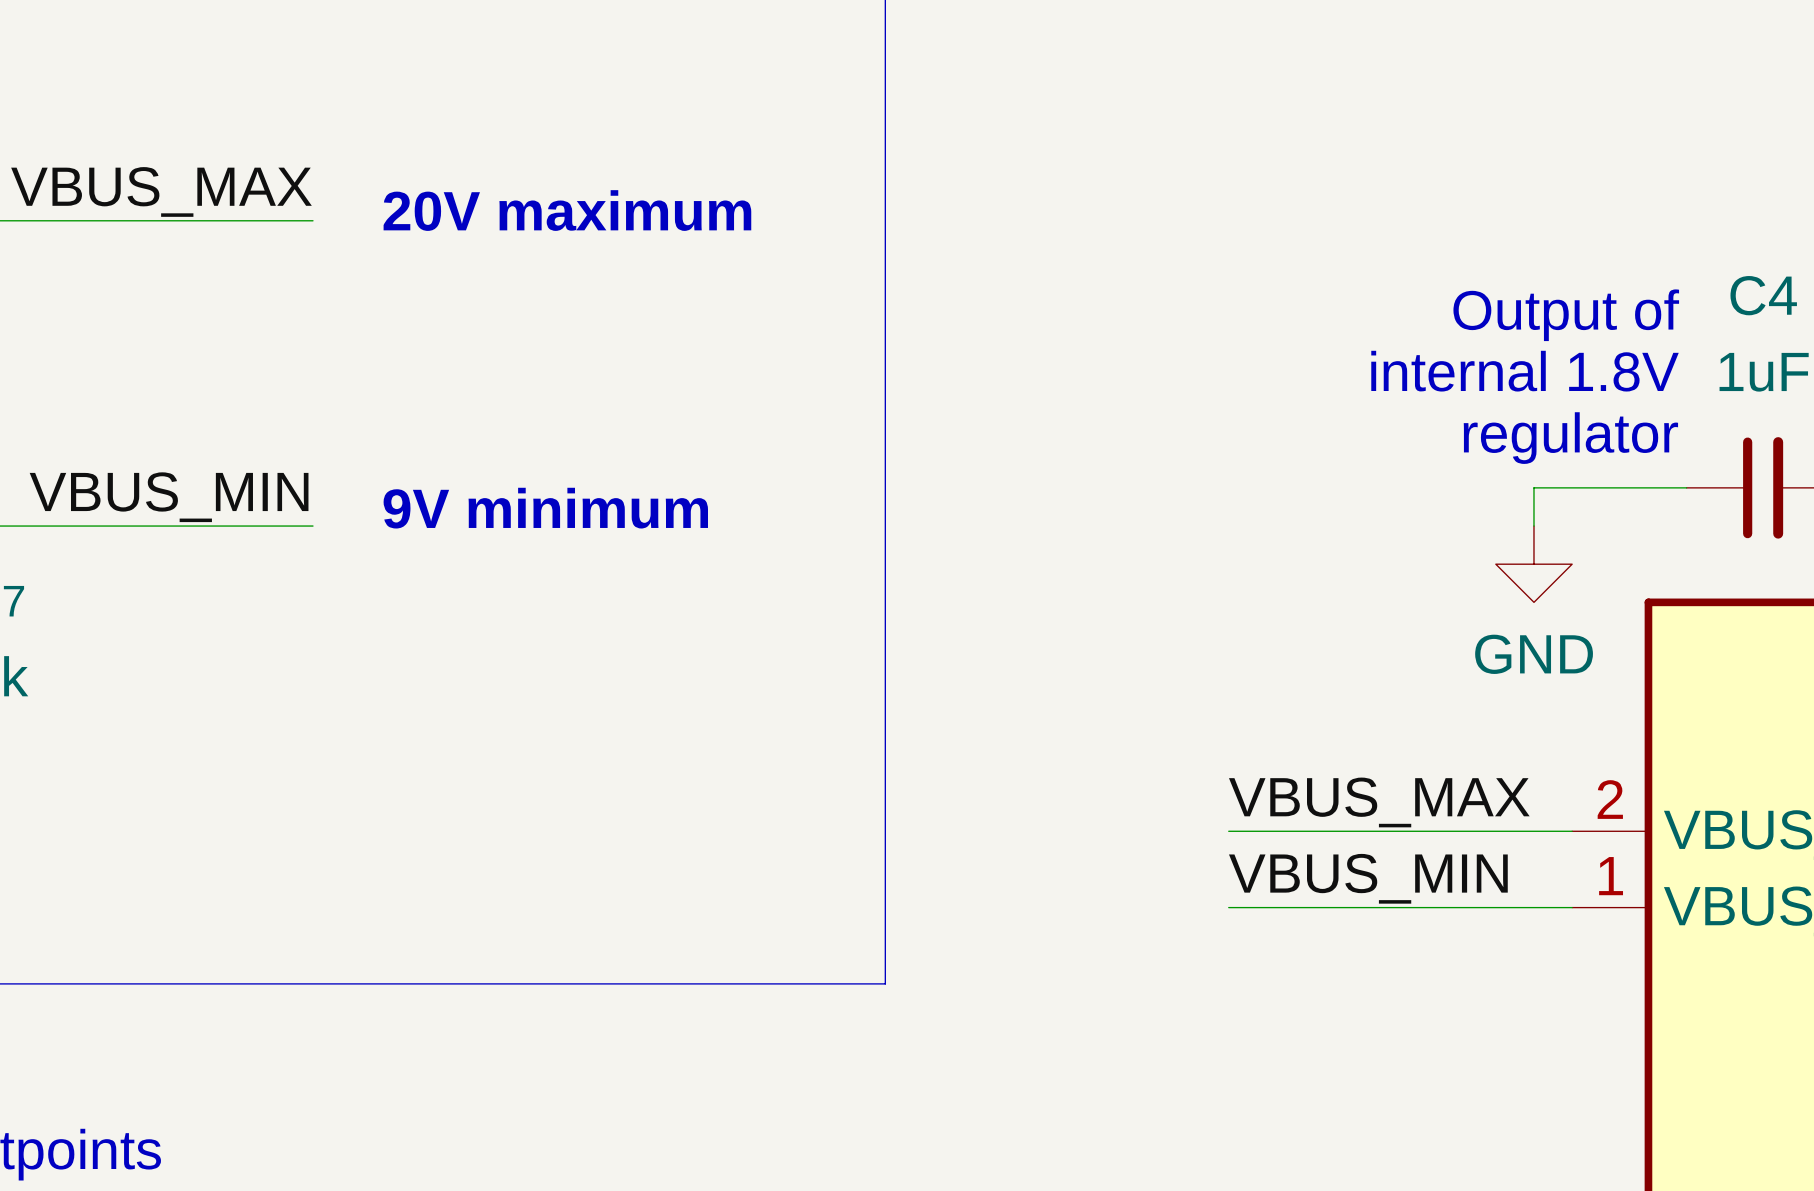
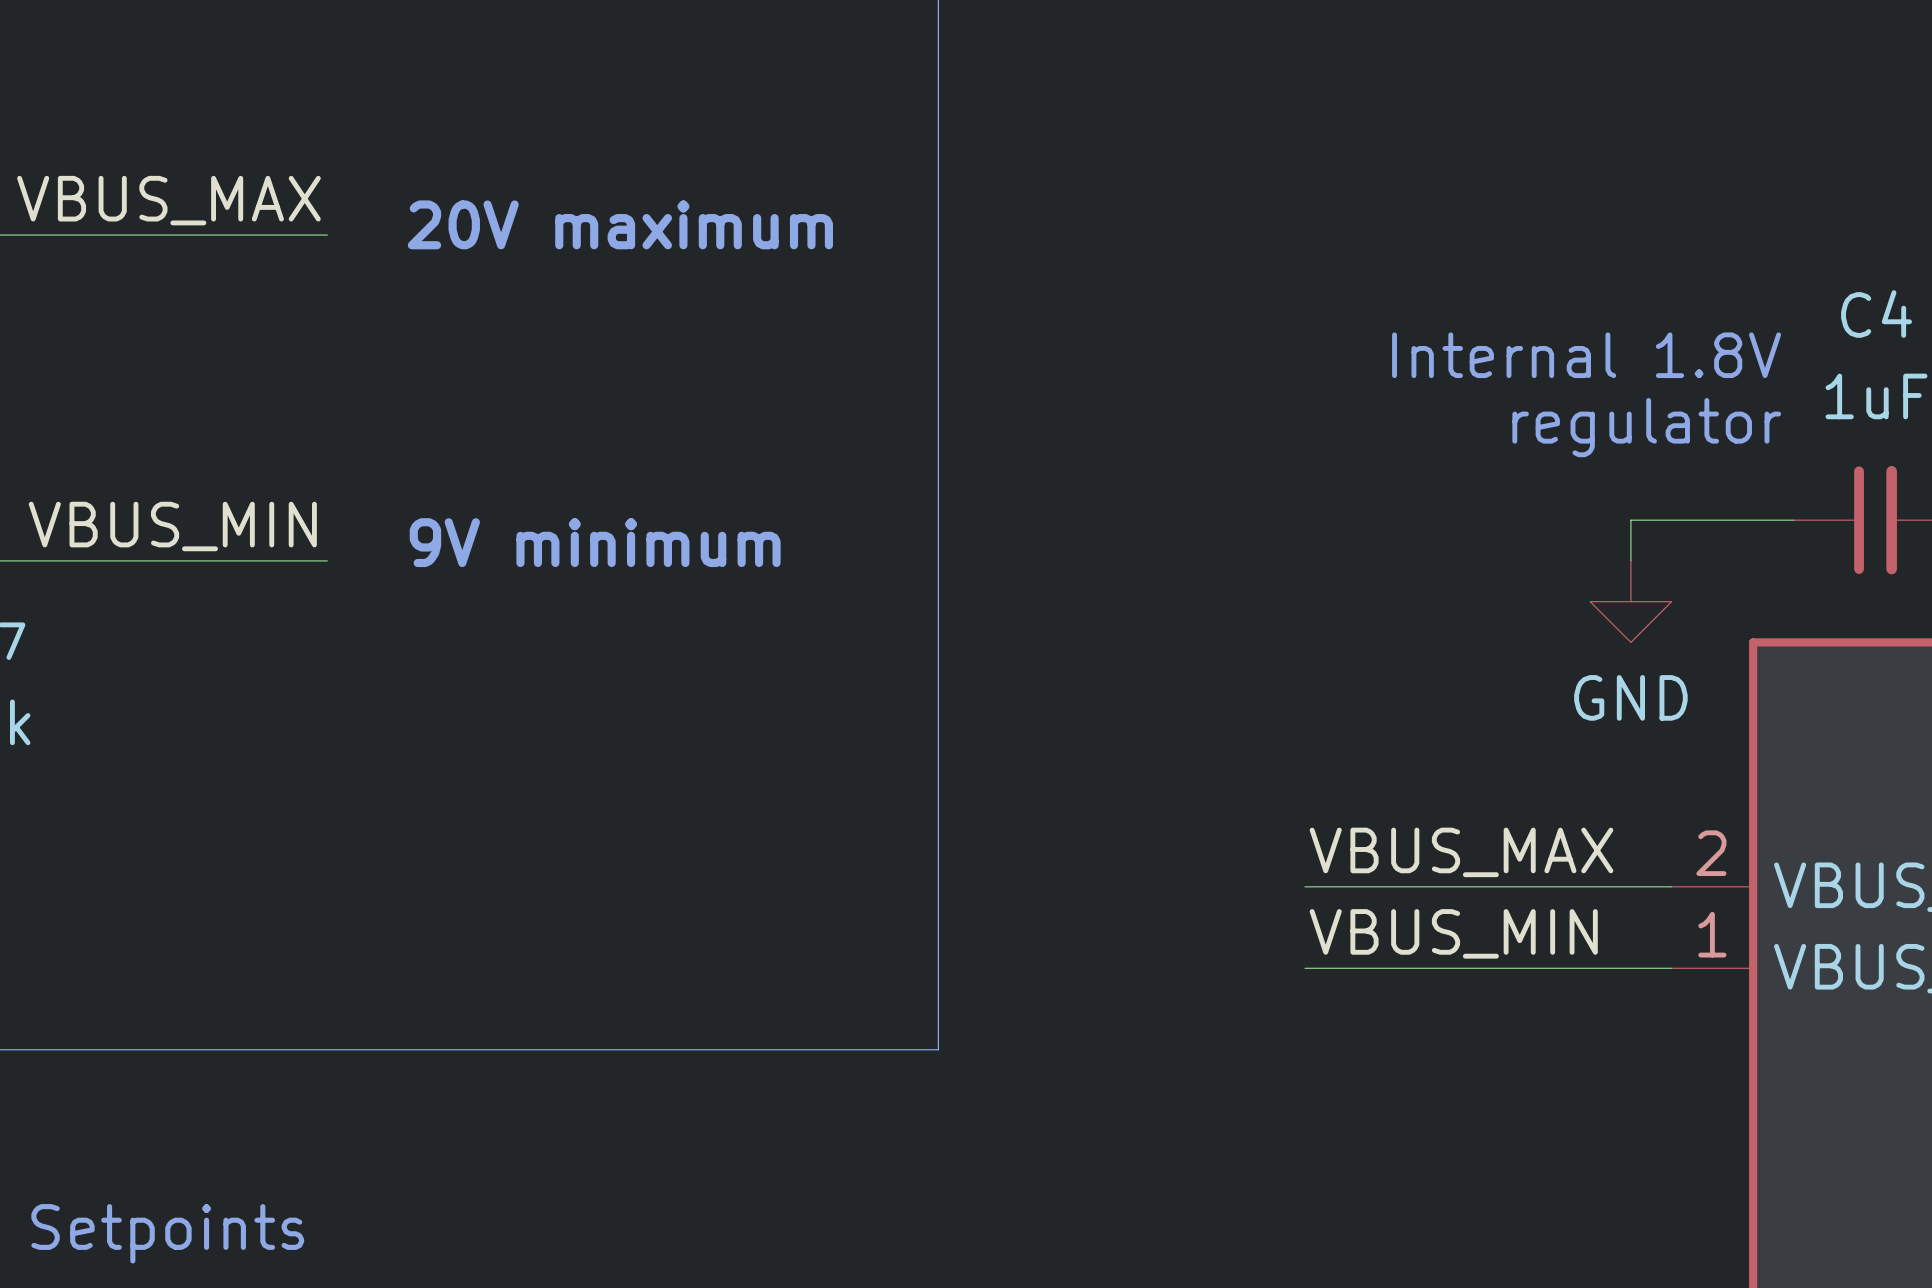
text: Output of (1566, 315) -> none
text: internal 1.8V (1525, 371) -> Internal 1.8V (1586, 355)
text position: regulator (1570, 438) -> regulator (1646, 427)

